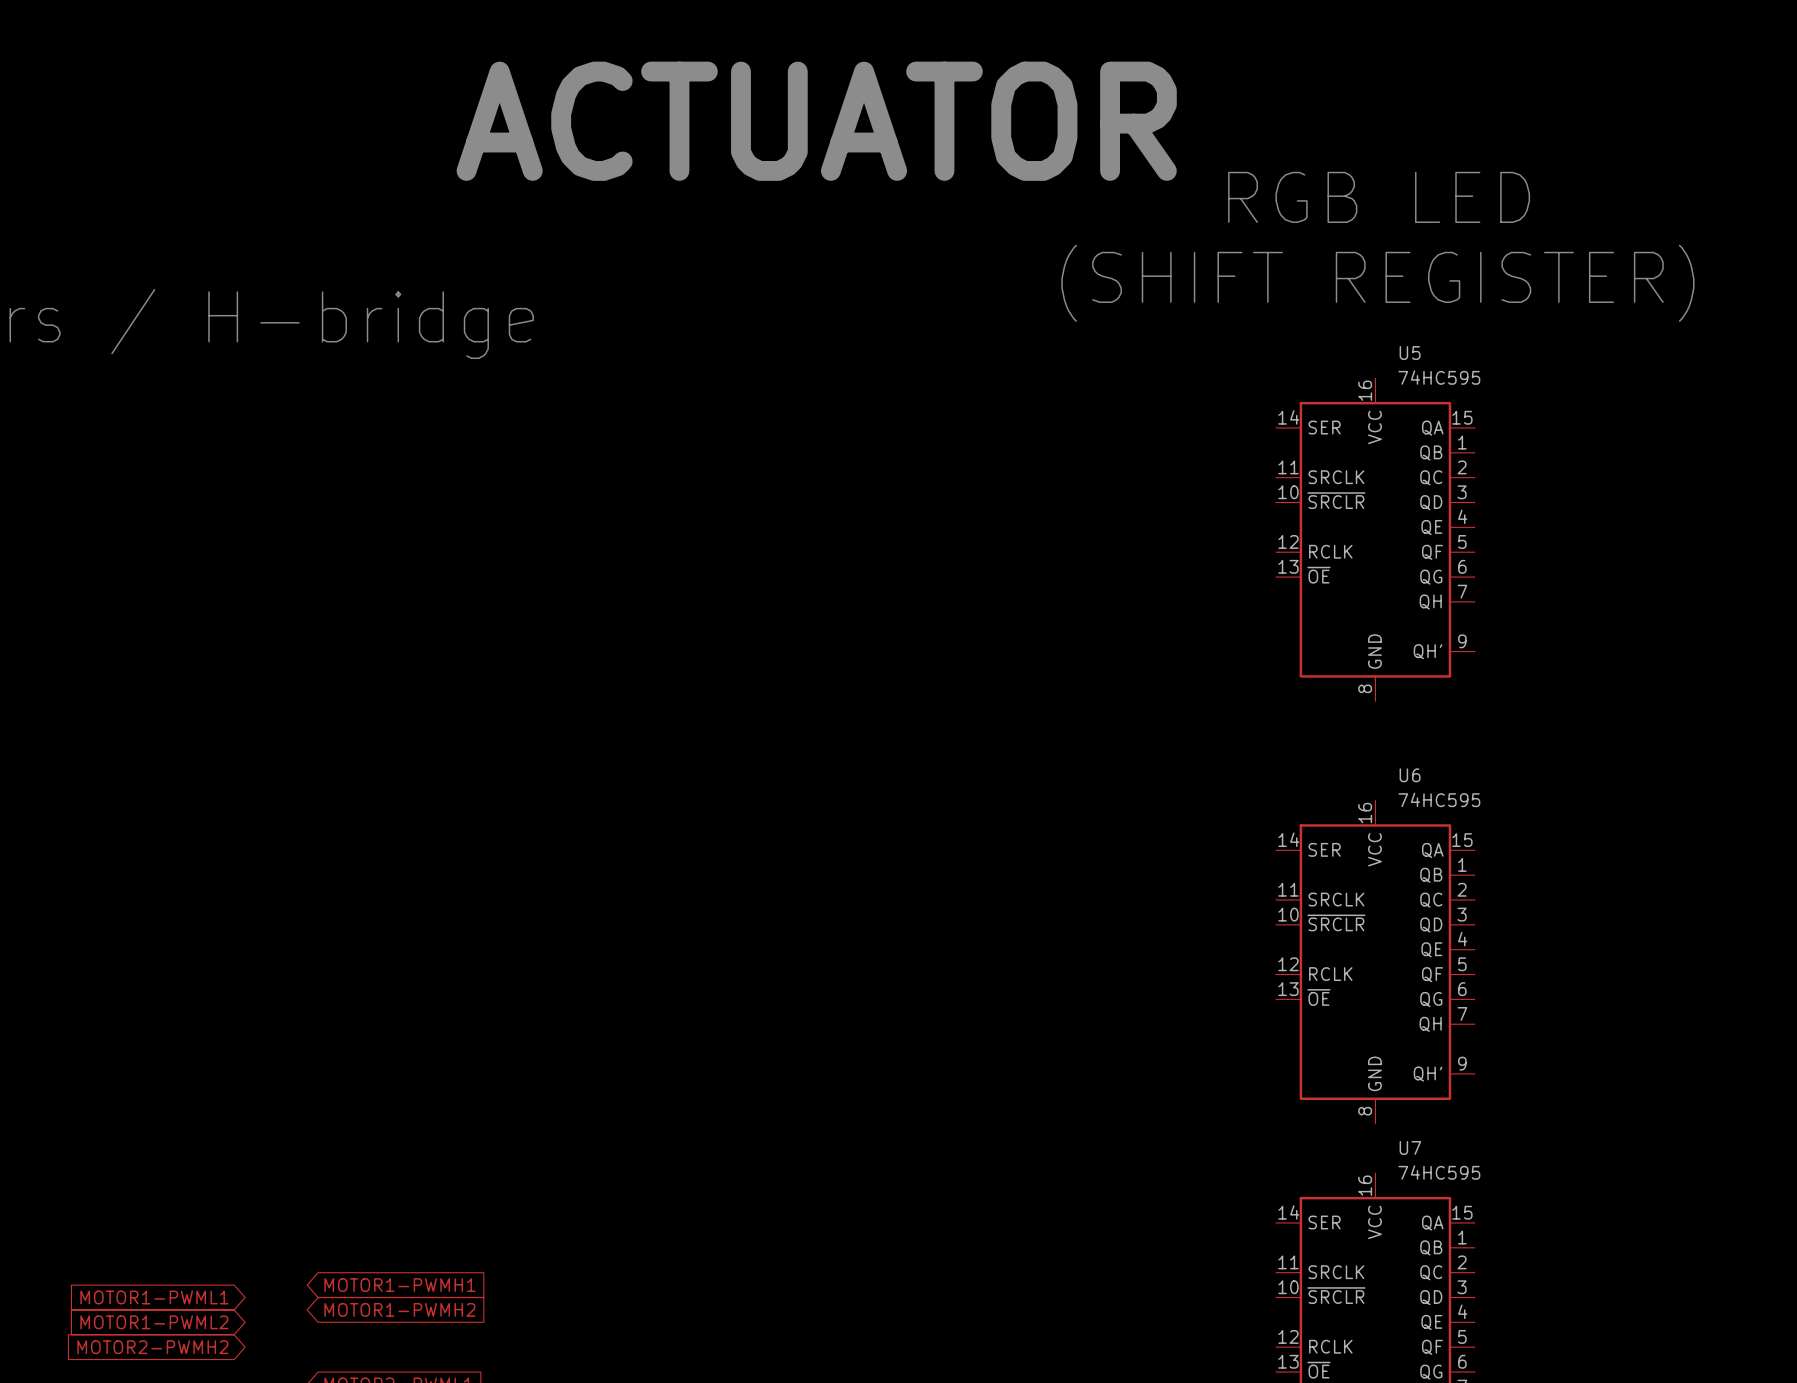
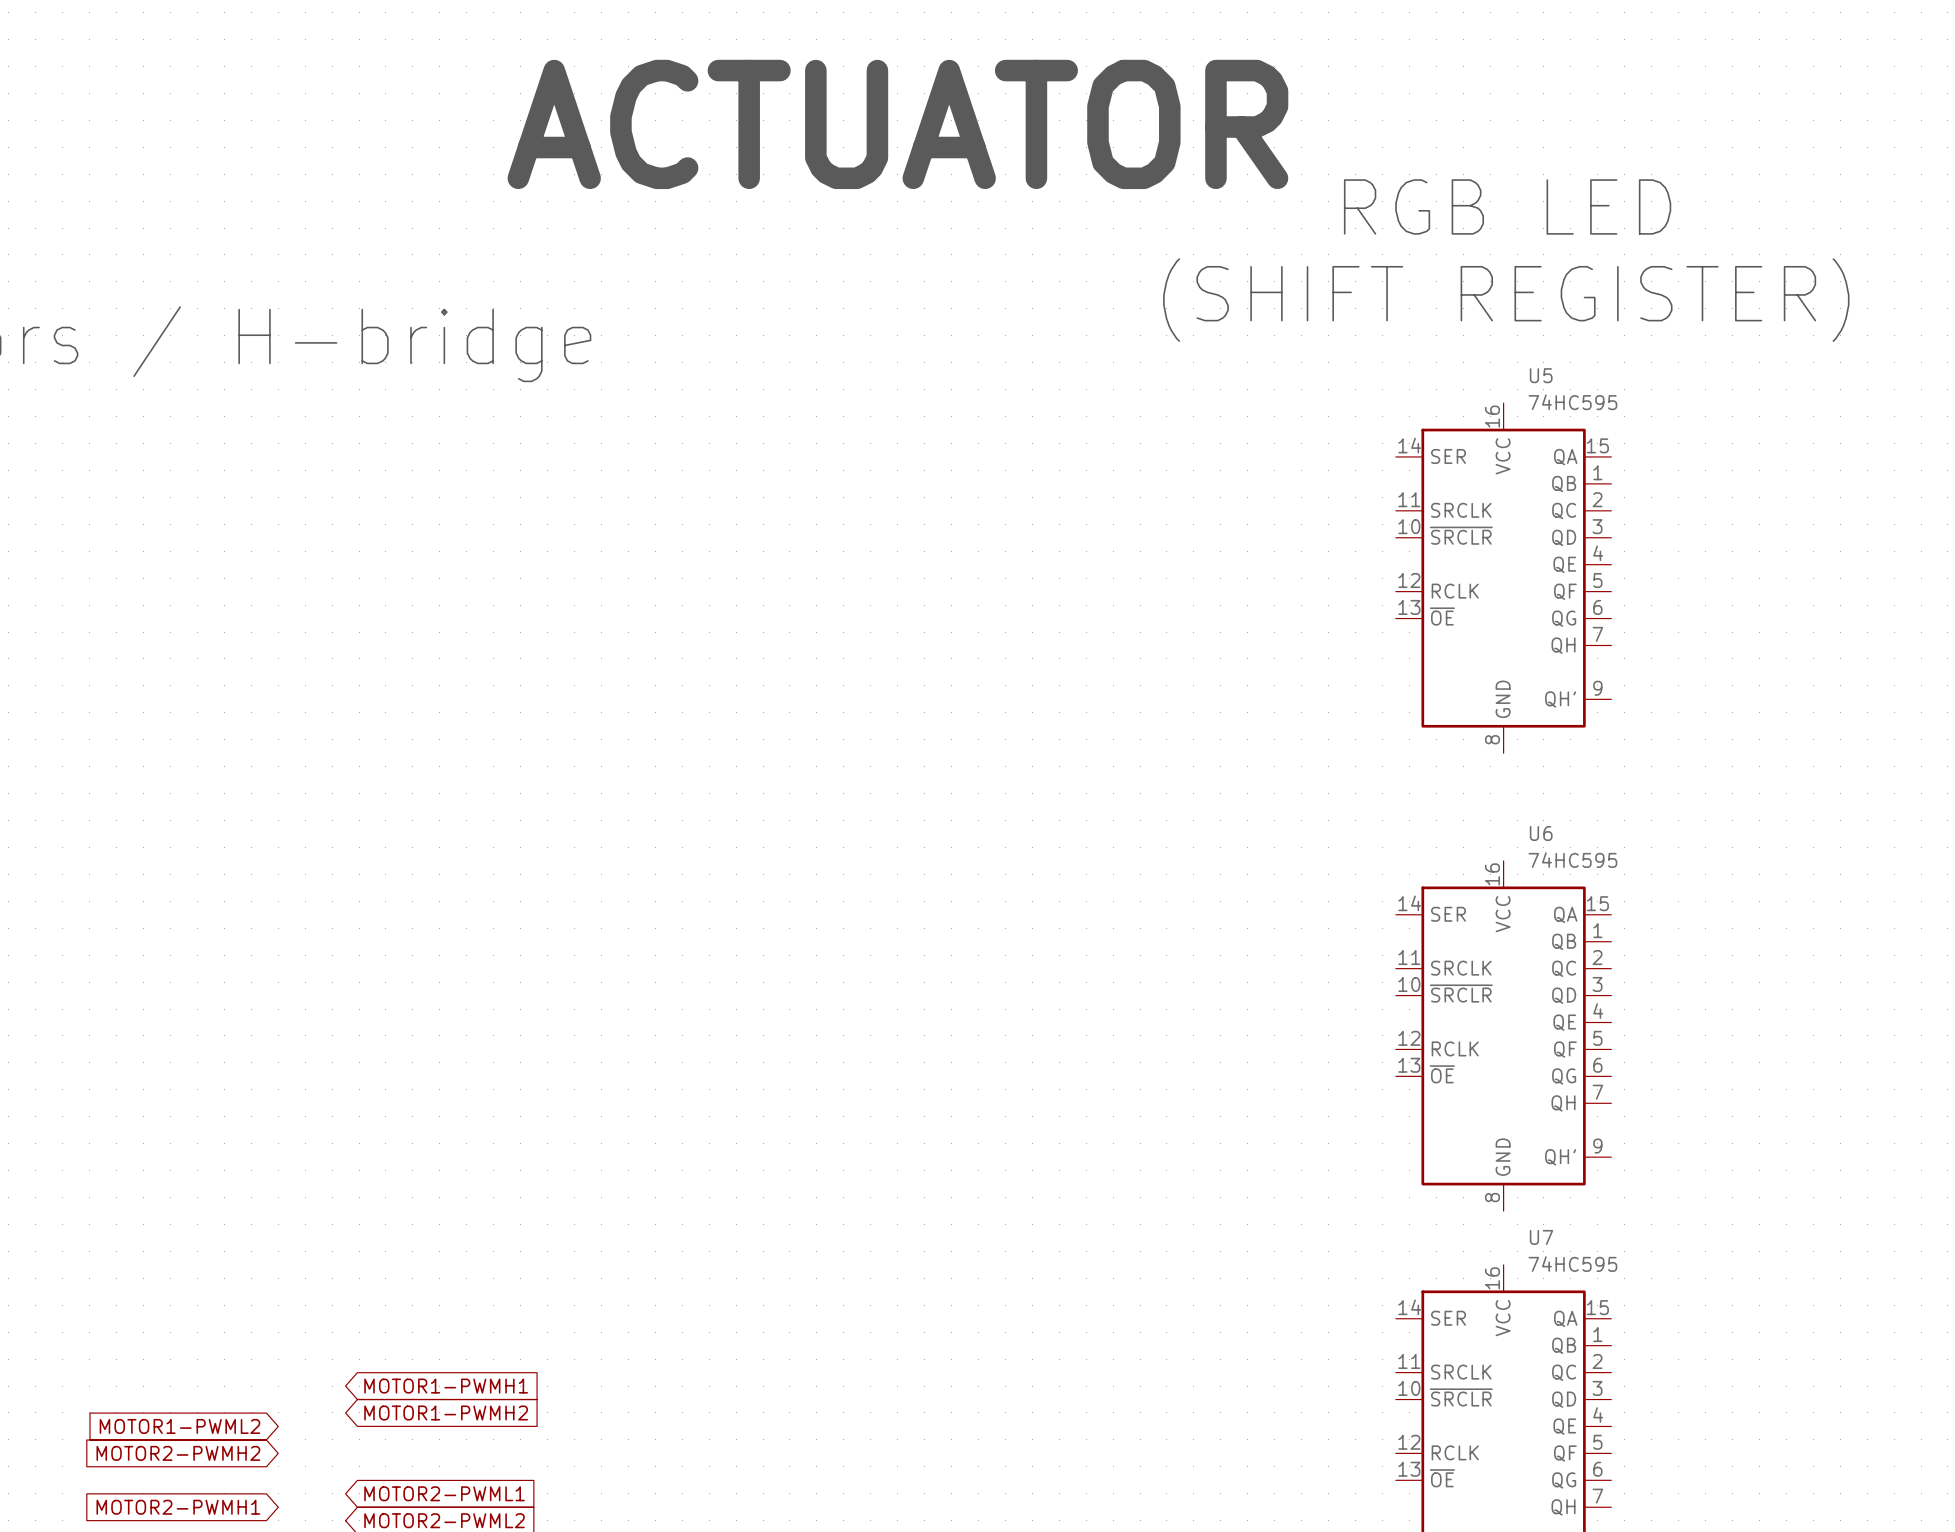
global label: MOTOR1-PWML1 (154, 1297) -> none

